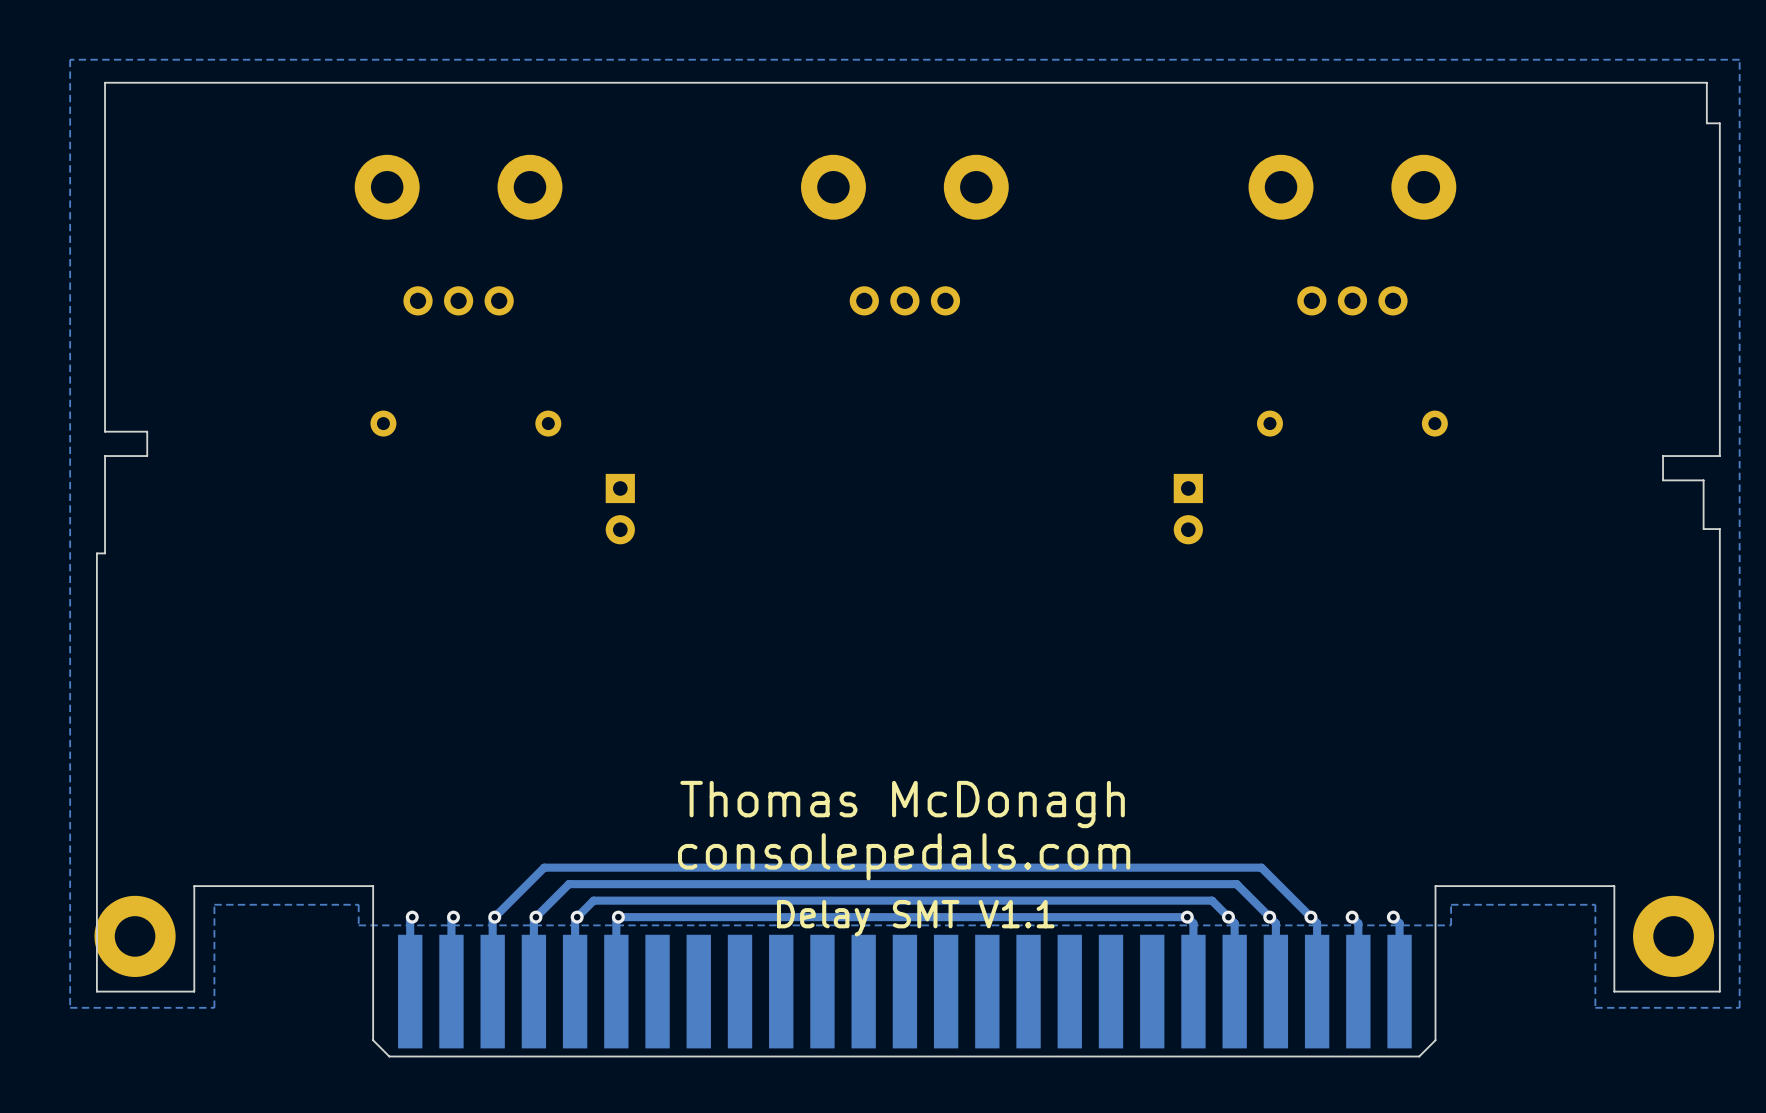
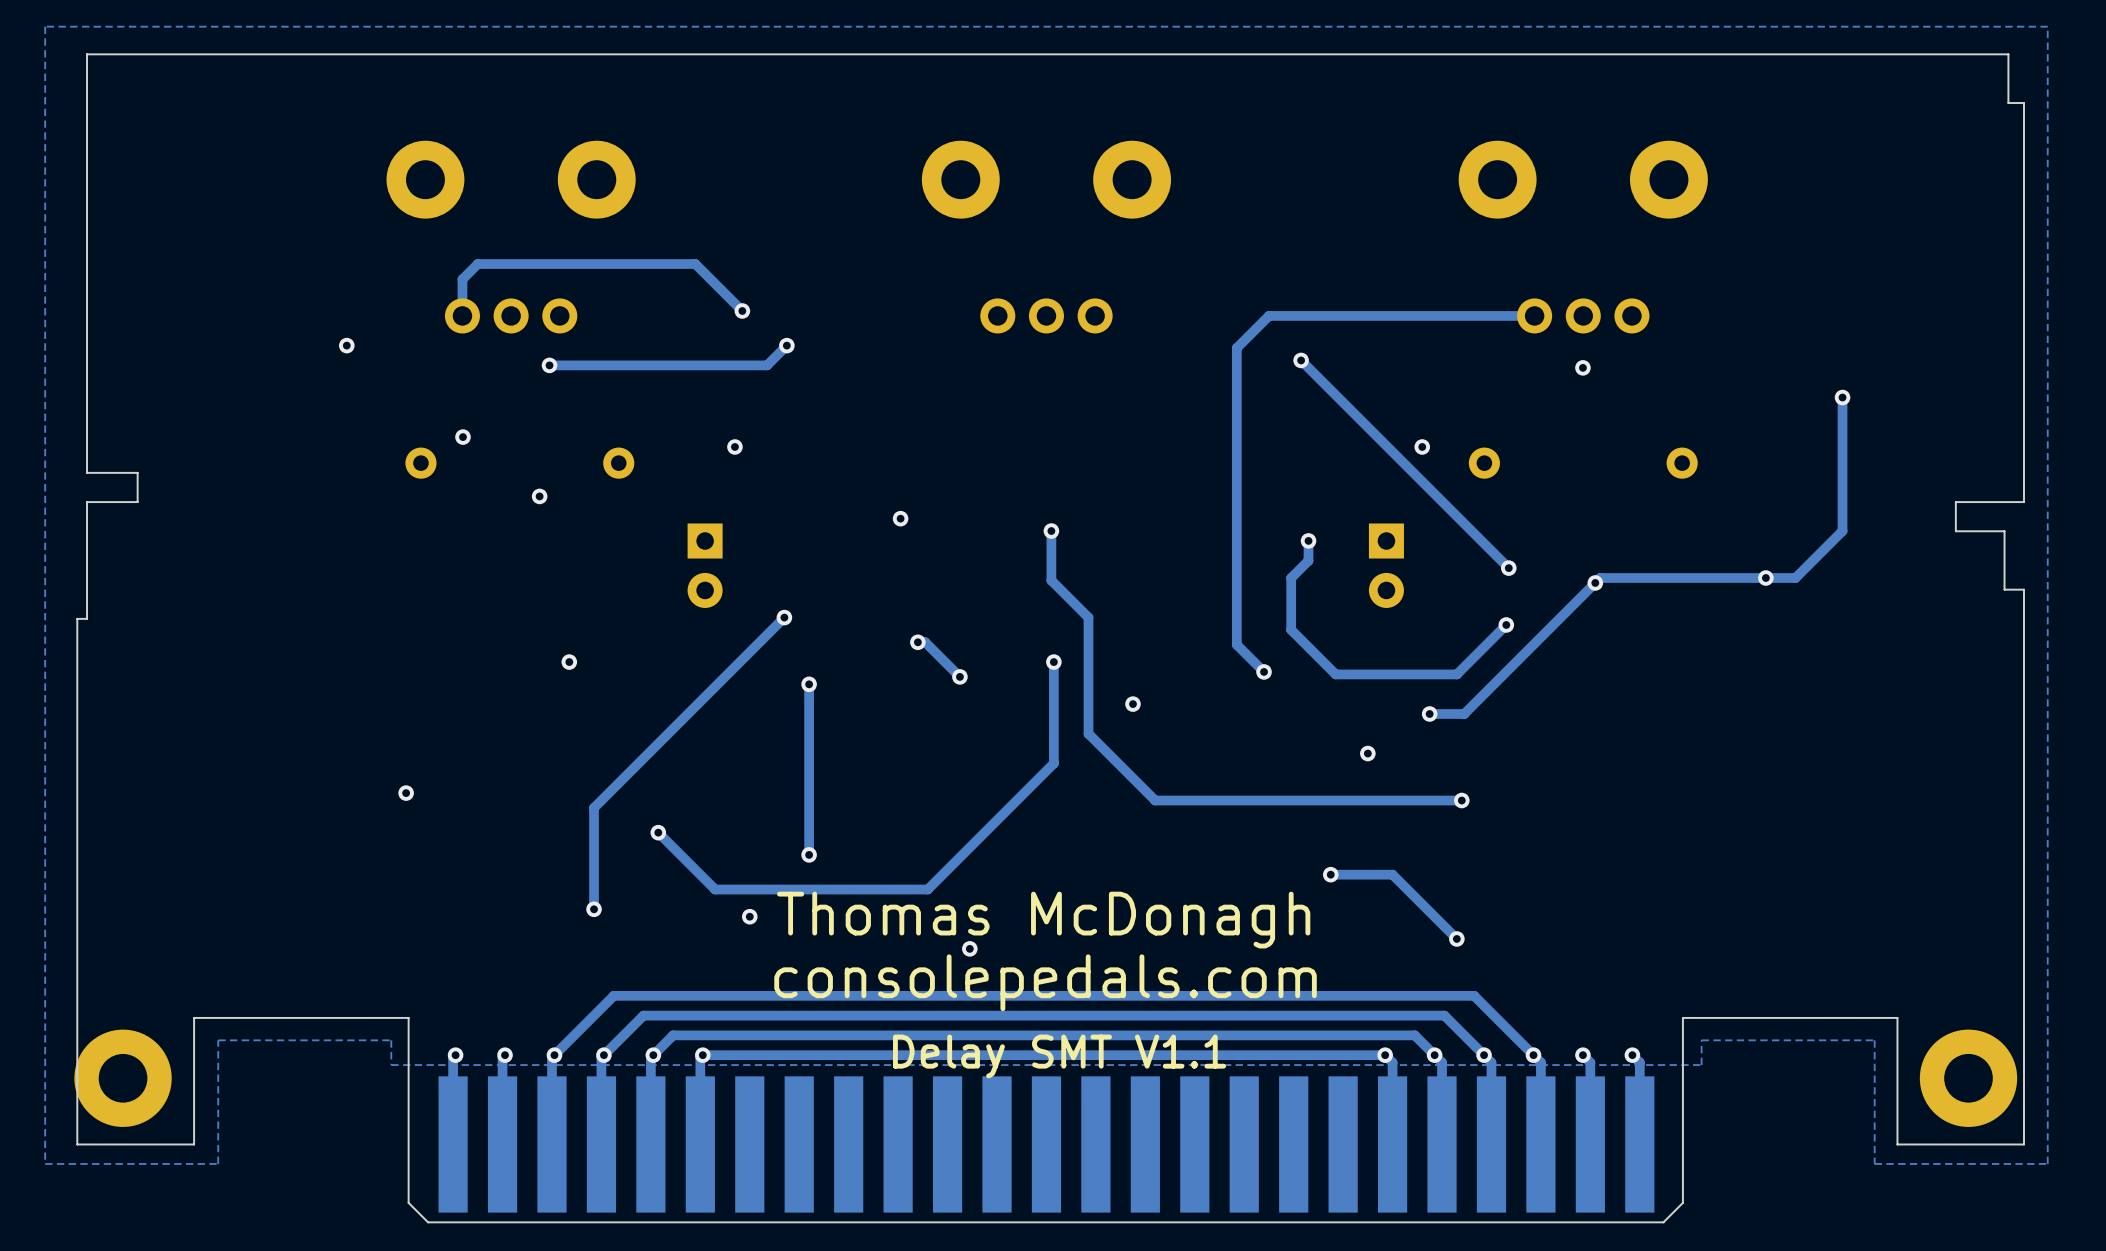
track: none -> (742, 311) (695, 264) (477, 264) (462, 279) (462, 315)
via: none -> (742, 311)
track: none -> (1534, 315) (1268, 315) (1236, 348) (1236, 644) (1264, 671)
via: none -> (346, 345)
track: none -> (786, 345) (767, 365) (549, 365)
via: none -> (786, 345)
track: none -> (1301, 360) (1508, 568)
via: none -> (1301, 360)
via: none -> (549, 365)
via: none -> (1582, 367)
track: none -> (1842, 397) (1842, 531) (1795, 578) (1600, 578) (1464, 713) (1429, 713)
via: none -> (1842, 397)
via: none -> (462, 437)
via: none -> (734, 446)
via: none -> (1422, 446)
via: none -> (539, 496)
via: none -> (900, 518)
track: none -> (1051, 531) (1051, 580) (1088, 617) (1088, 733) (1155, 800) (1461, 800)
via: none -> (1051, 531)
track: none -> (1308, 540) (1308, 560) (1291, 578) (1291, 629) (1335, 674) (1456, 674) (1506, 624)
via: none -> (1308, 540)
via: none -> (1508, 568)
via: none -> (1765, 578)
via: none -> (1595, 582)
track: none -> (784, 617) (594, 807) (594, 909)
via: none -> (784, 617)
via: none -> (1506, 624)
track: none -> (917, 642) (925, 642) (959, 676)
via: none -> (917, 642)
via: none -> (569, 662)
track: none -> (1053, 662) (1053, 763) (927, 889) (715, 889) (658, 832)
via: none -> (1053, 662)
via: none -> (1264, 671)
via: none -> (959, 676)
track: none -> (809, 684) (809, 854)
via: none -> (809, 684)
via: none -> (1132, 704)
via: none -> (1429, 713)
via: none -> (1367, 753)
via: none -> (406, 793)
via: none -> (1461, 800)
via: none -> (658, 832)
via: none -> (809, 854)
track: none -> (1330, 874) (1392, 874) (1456, 938)
via: none -> (1330, 874)
via: none -> (594, 909)
via: none -> (749, 916)
via: none -> (1456, 938)
via: none -> (969, 948)

